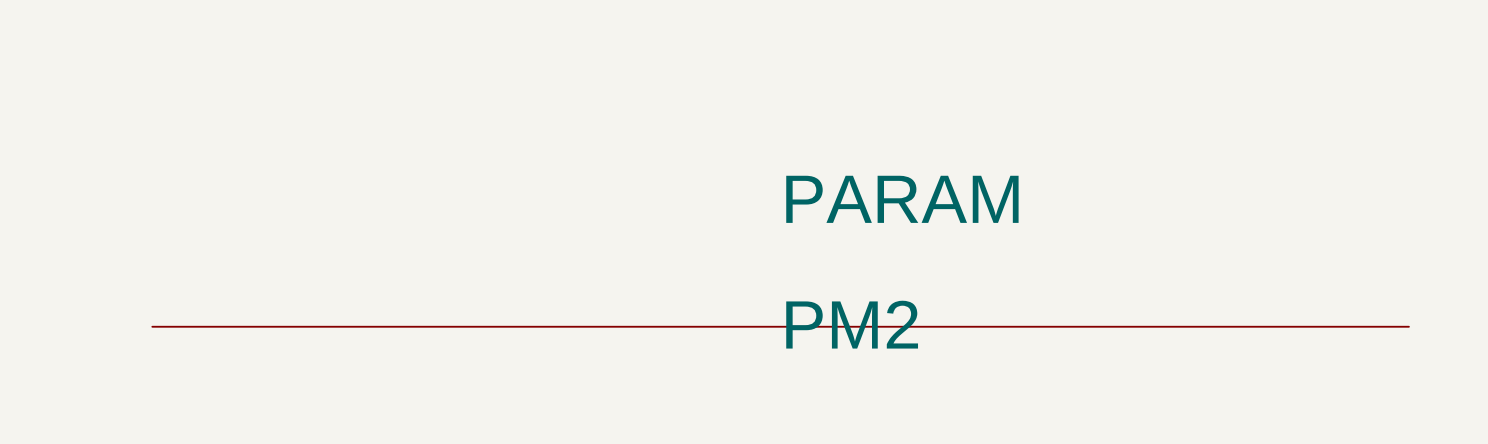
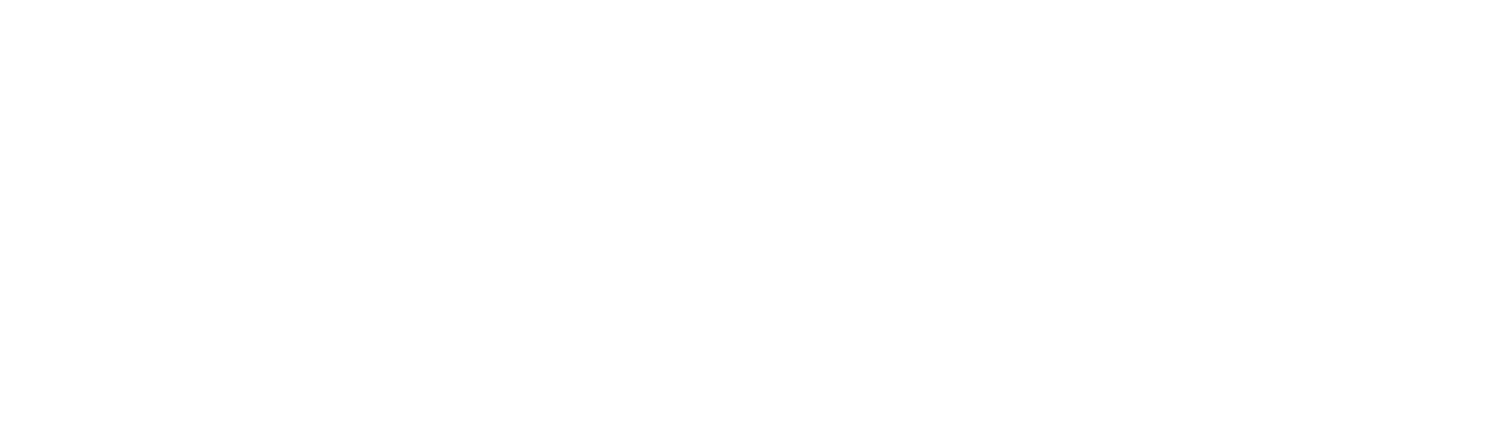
PM2: PARAM (780, 326) -> none

